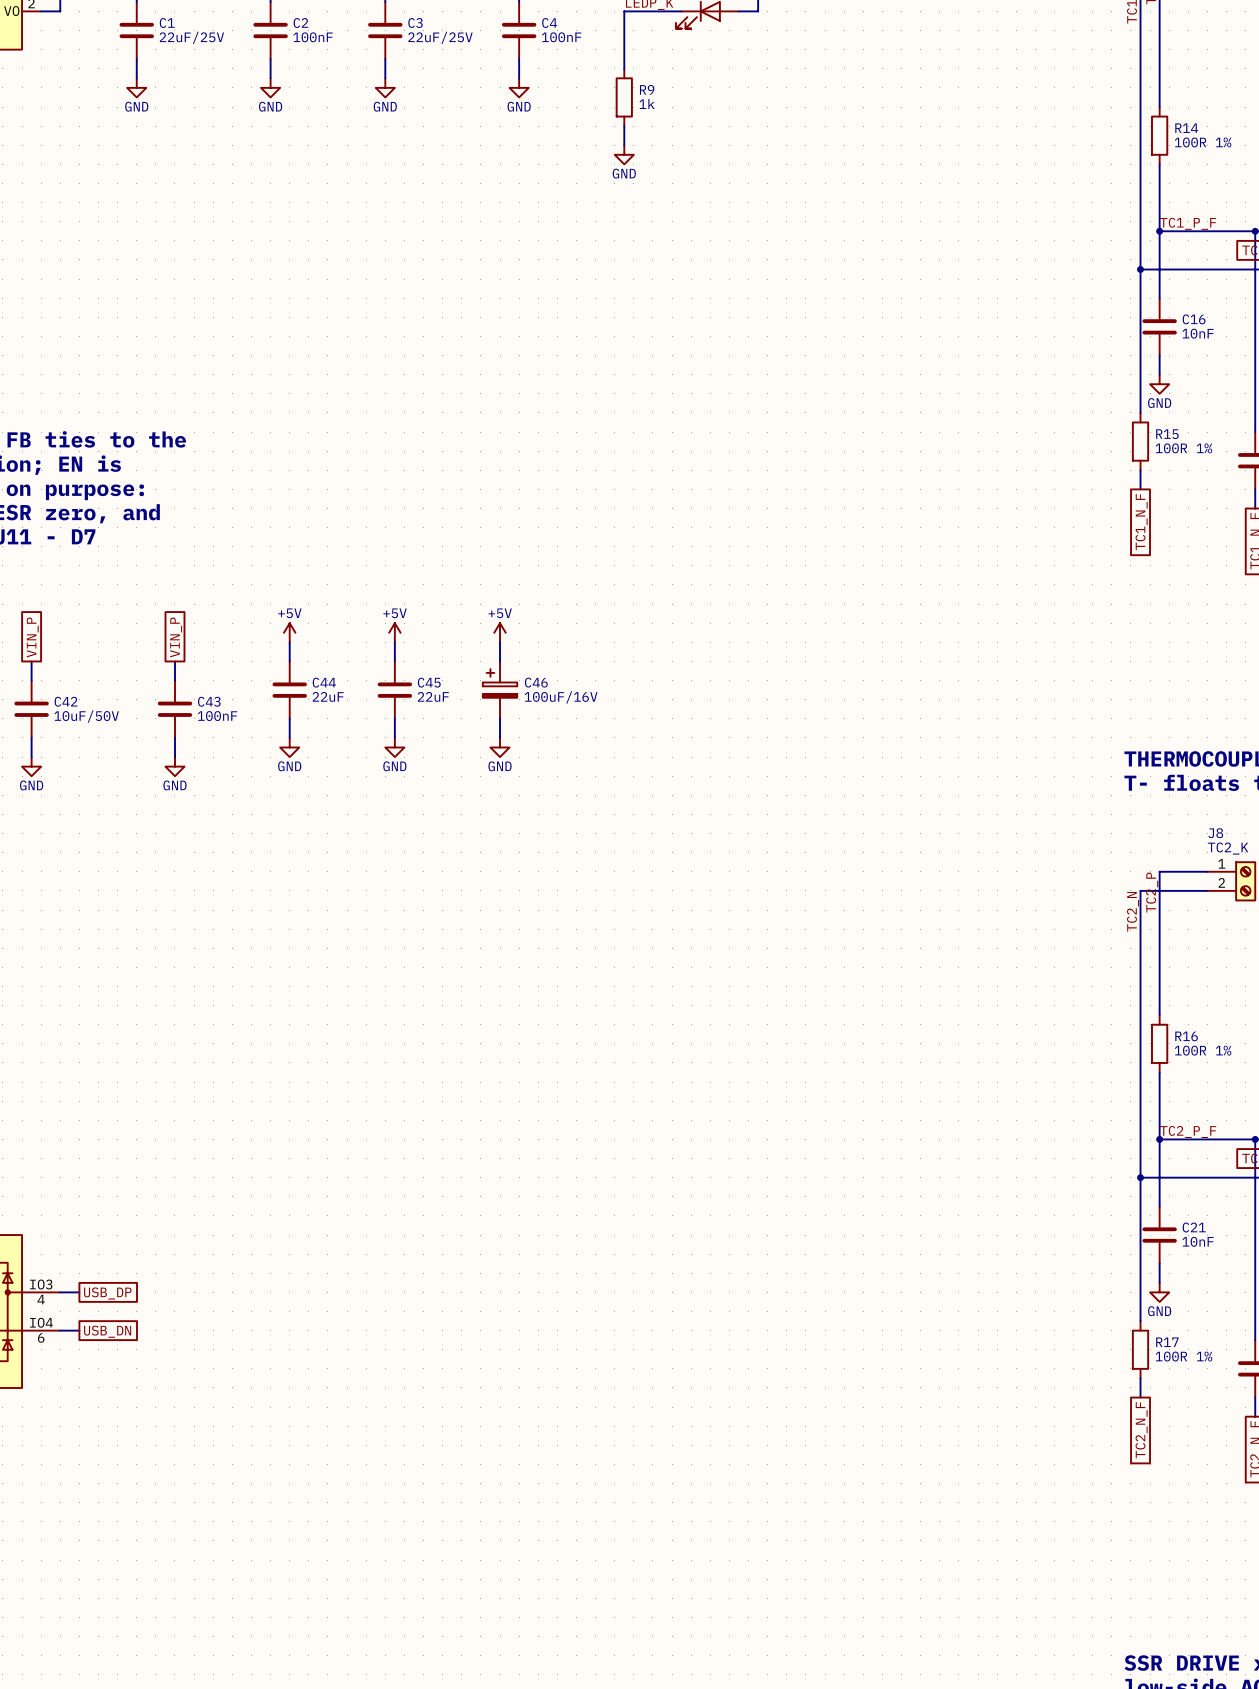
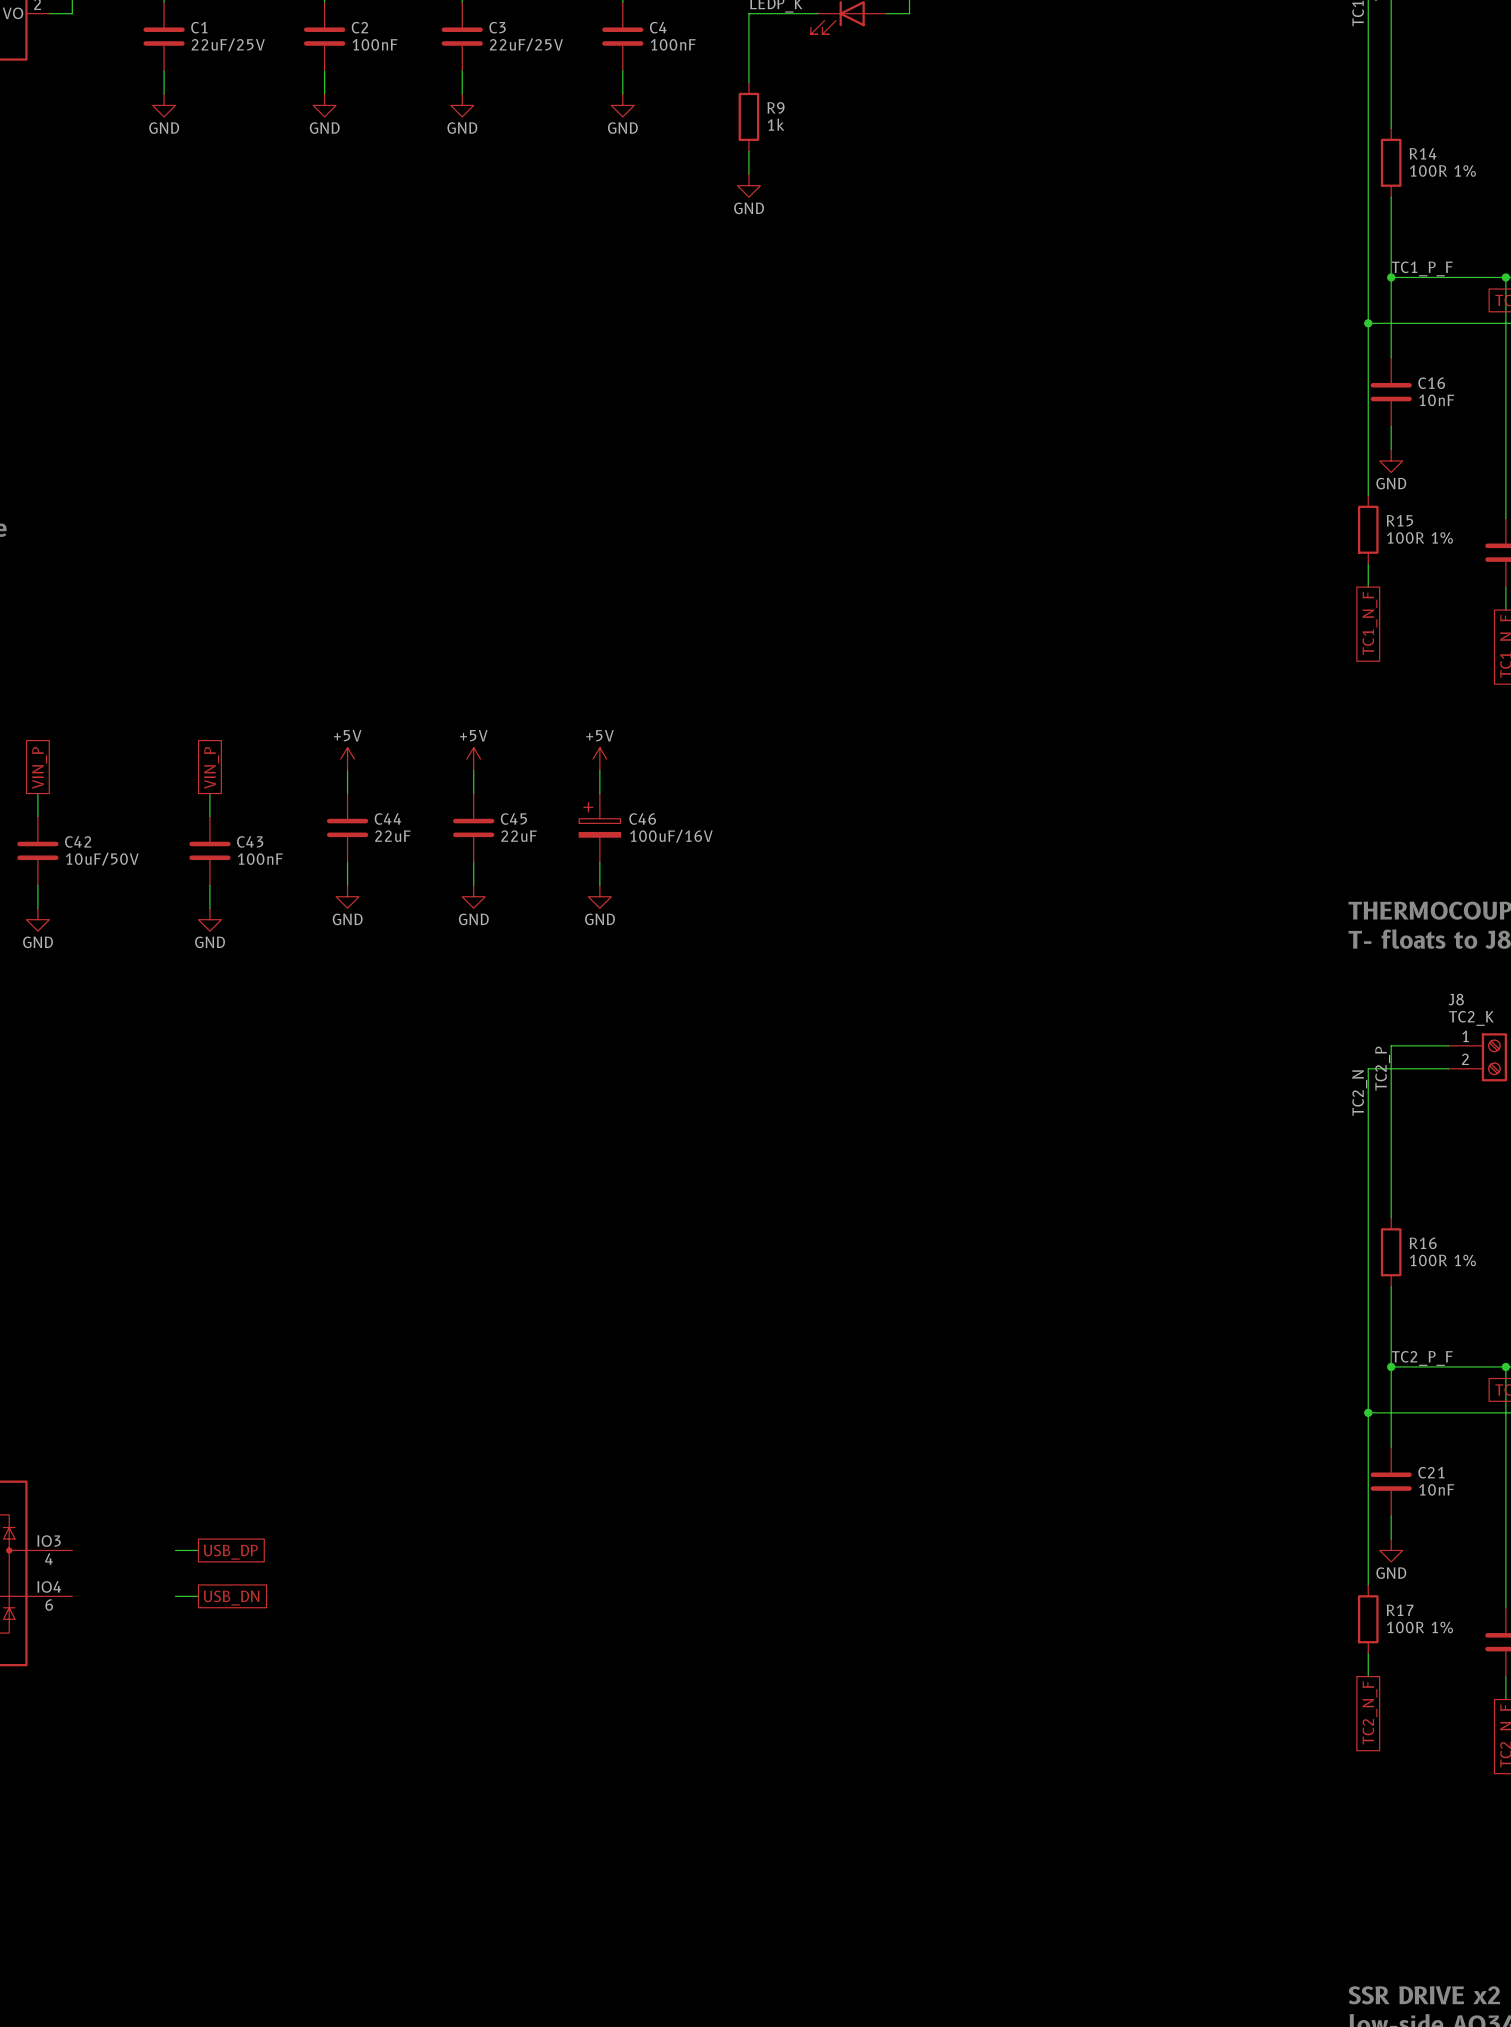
wire: (60, 1292) (79, 1292) -> (175, 1550) (198, 1550)
global label: USB_DP (107, 1293) -> none
global label: none -> USB_DP (230, 1552)
wire: (60, 1330) (79, 1330) -> (175, 1596) (198, 1596)
global label: USB_DN (107, 1331) -> none
global label: none -> USB_DN (231, 1598)

